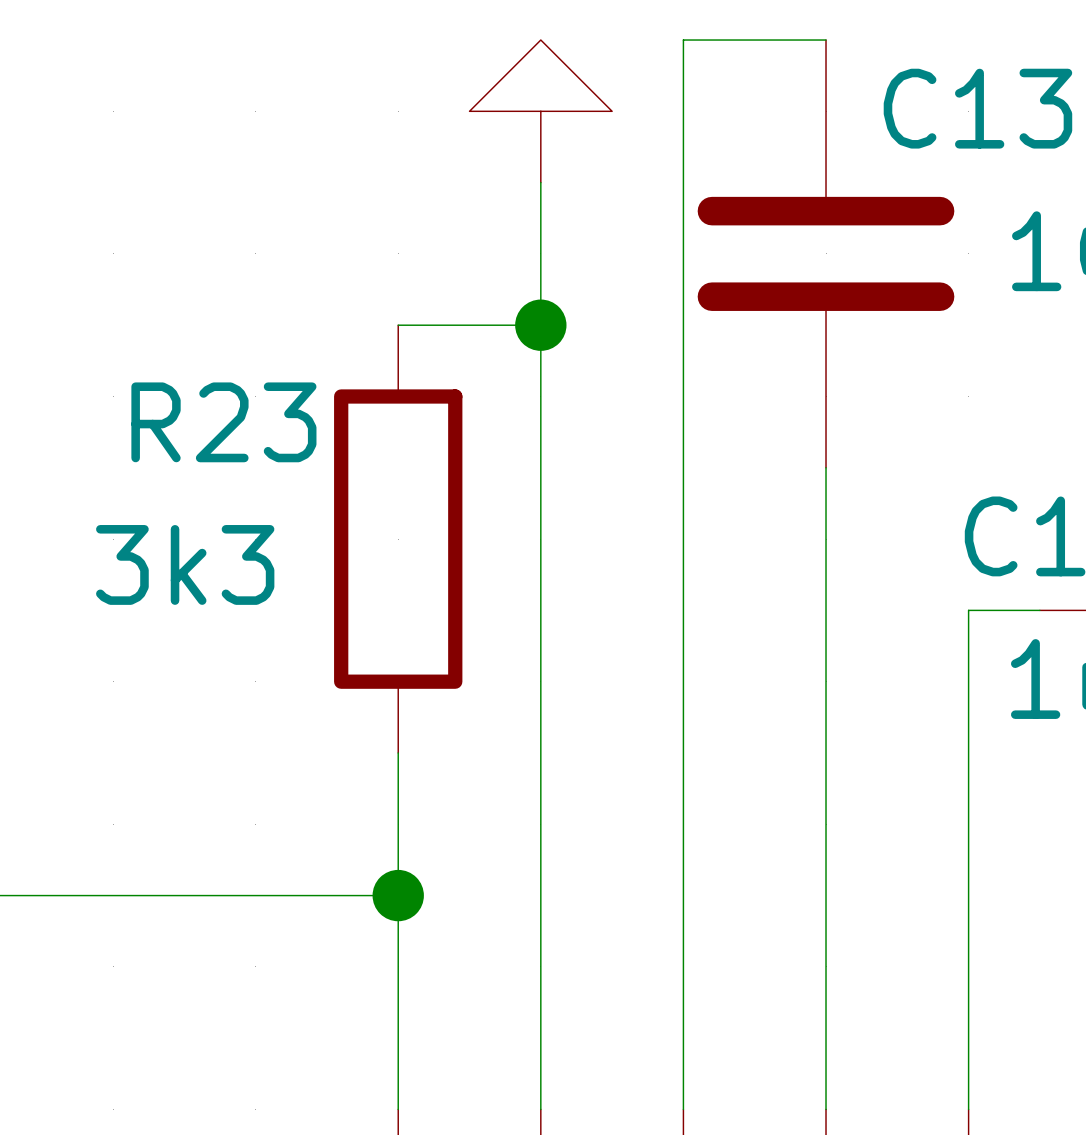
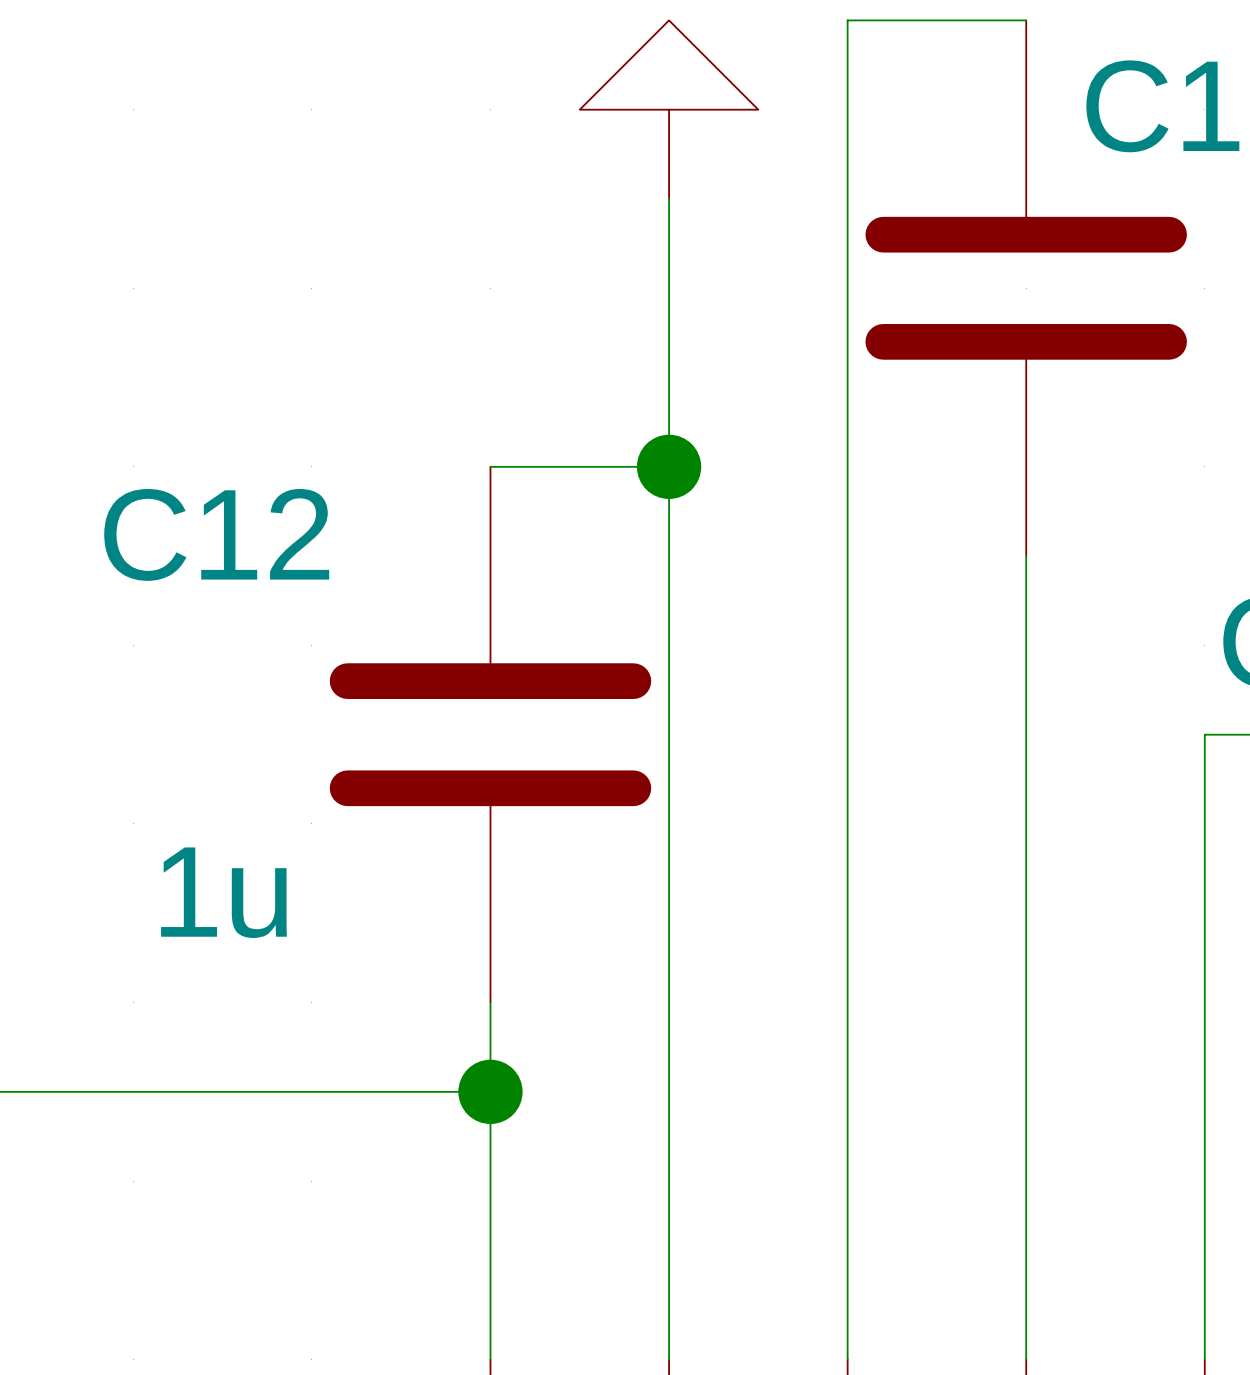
wire: (398, 325) (540, 325) -> (490, 466) (669, 466)
junction position: (540, 325) -> (669, 466)
R23: 3k3 (398, 539) -> none
C12: none -> 1u (490, 734)

